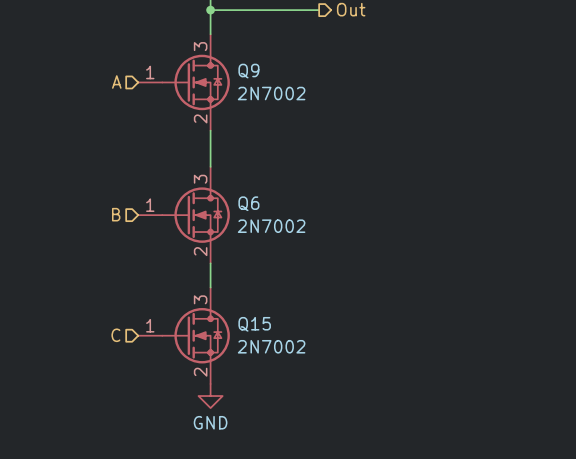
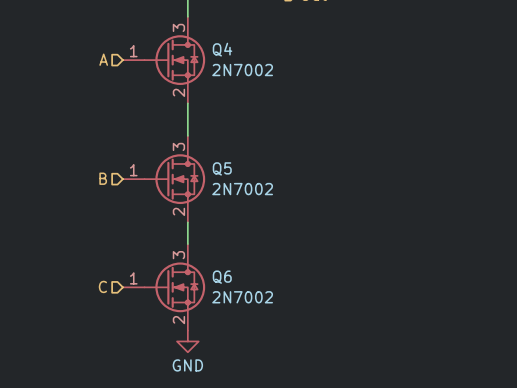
Q9 name: Q9 (248, 71) -> Q4 (222, 49)
Q6 name: Q6 (248, 203) -> Q5 (222, 168)
Q15 name: Q15 (254, 324) -> Q6 (222, 277)

